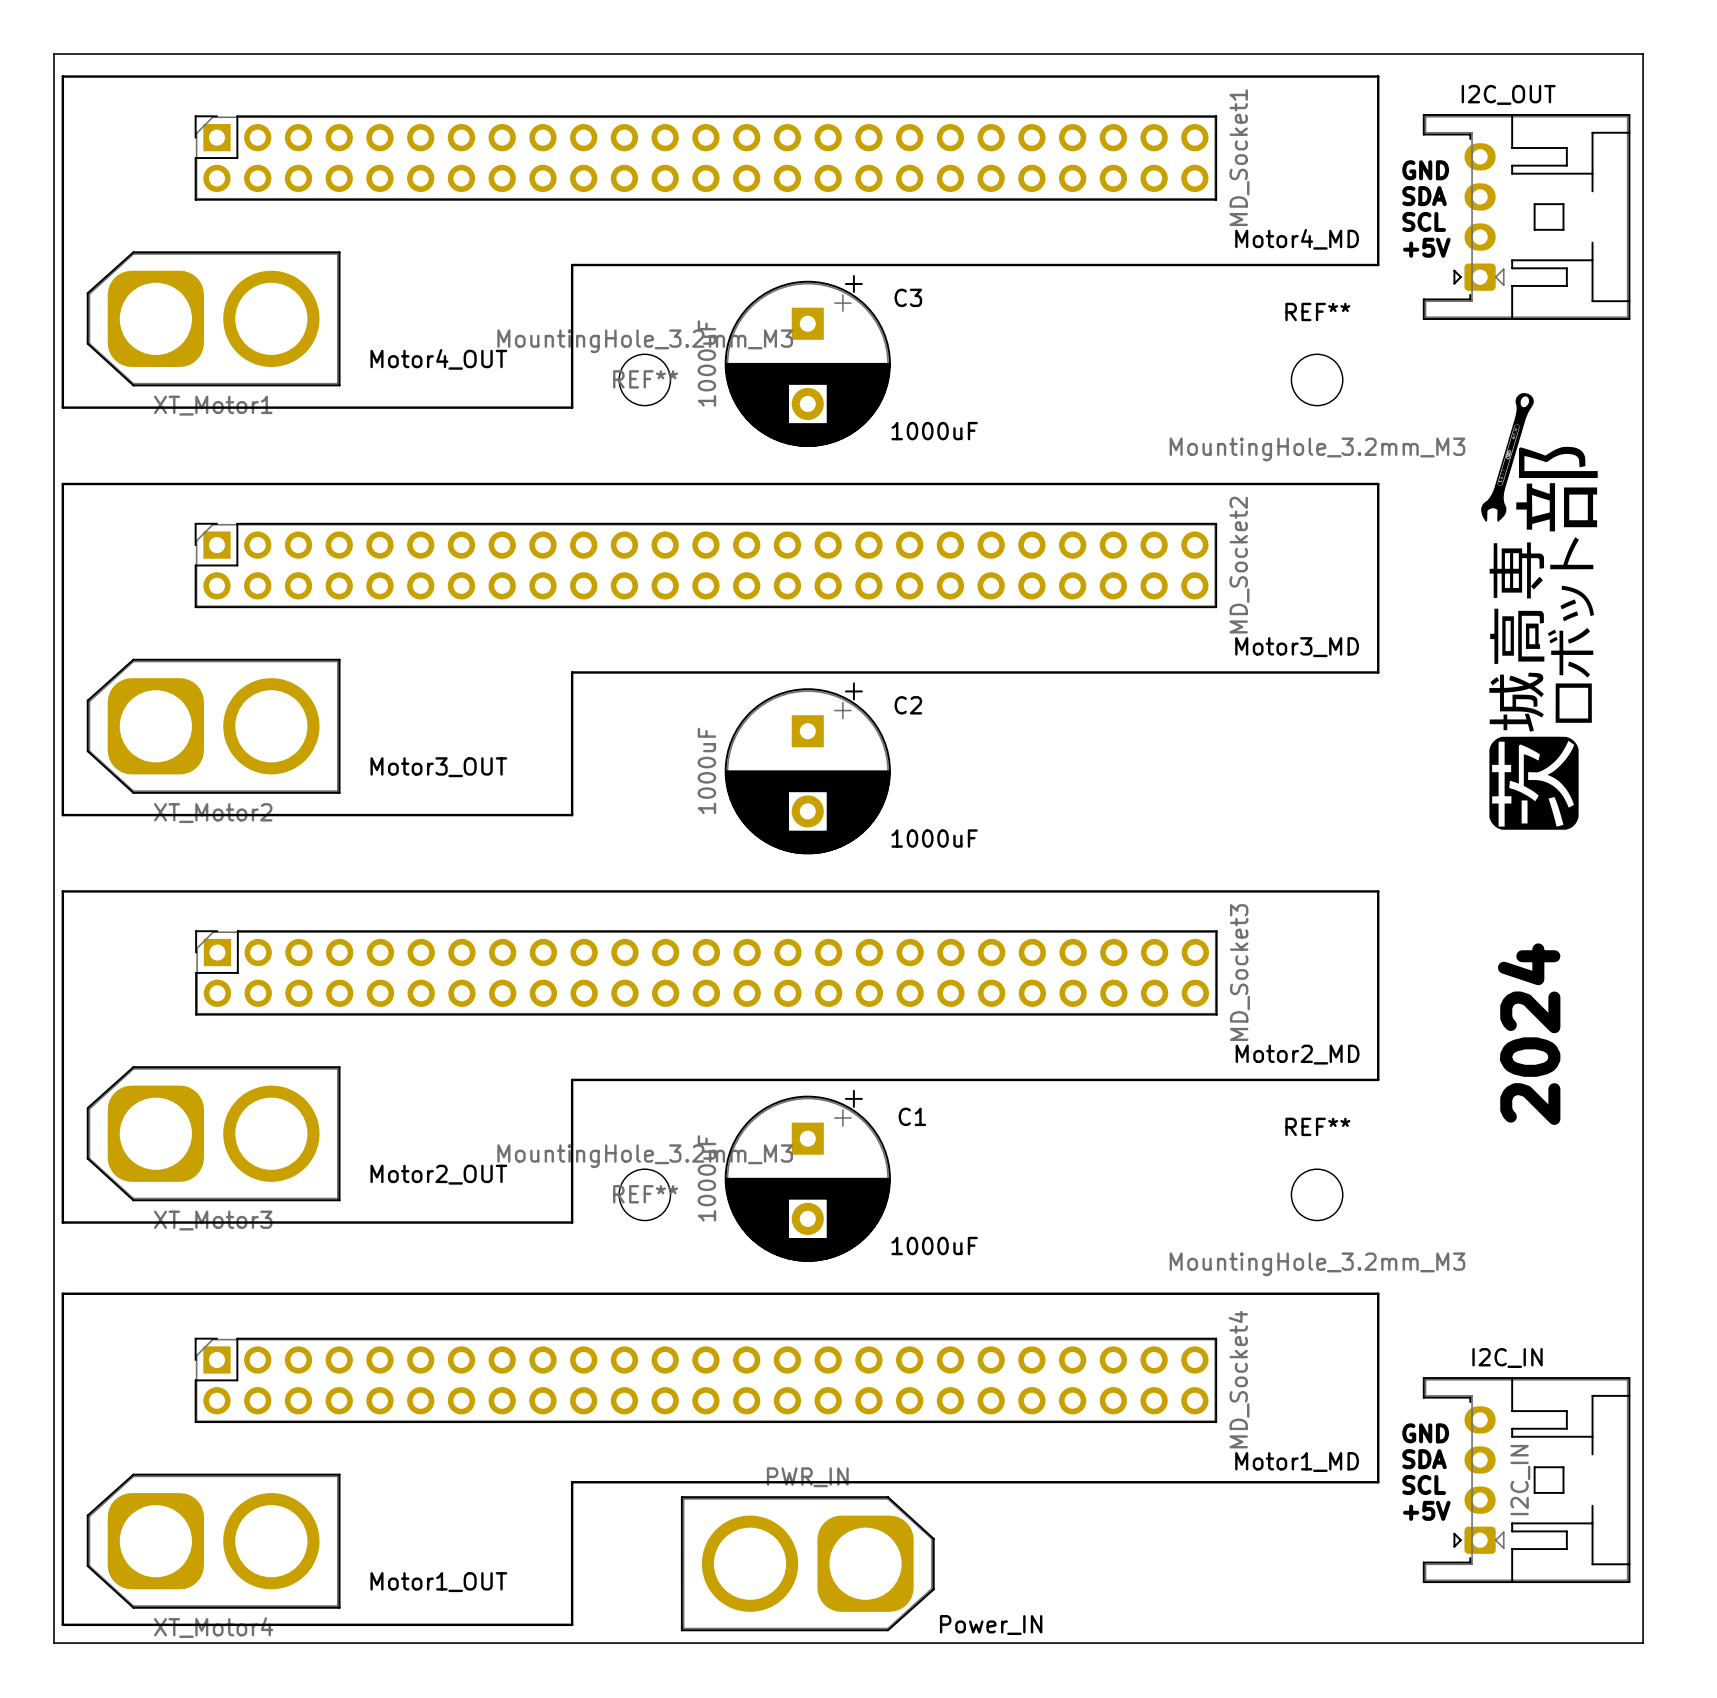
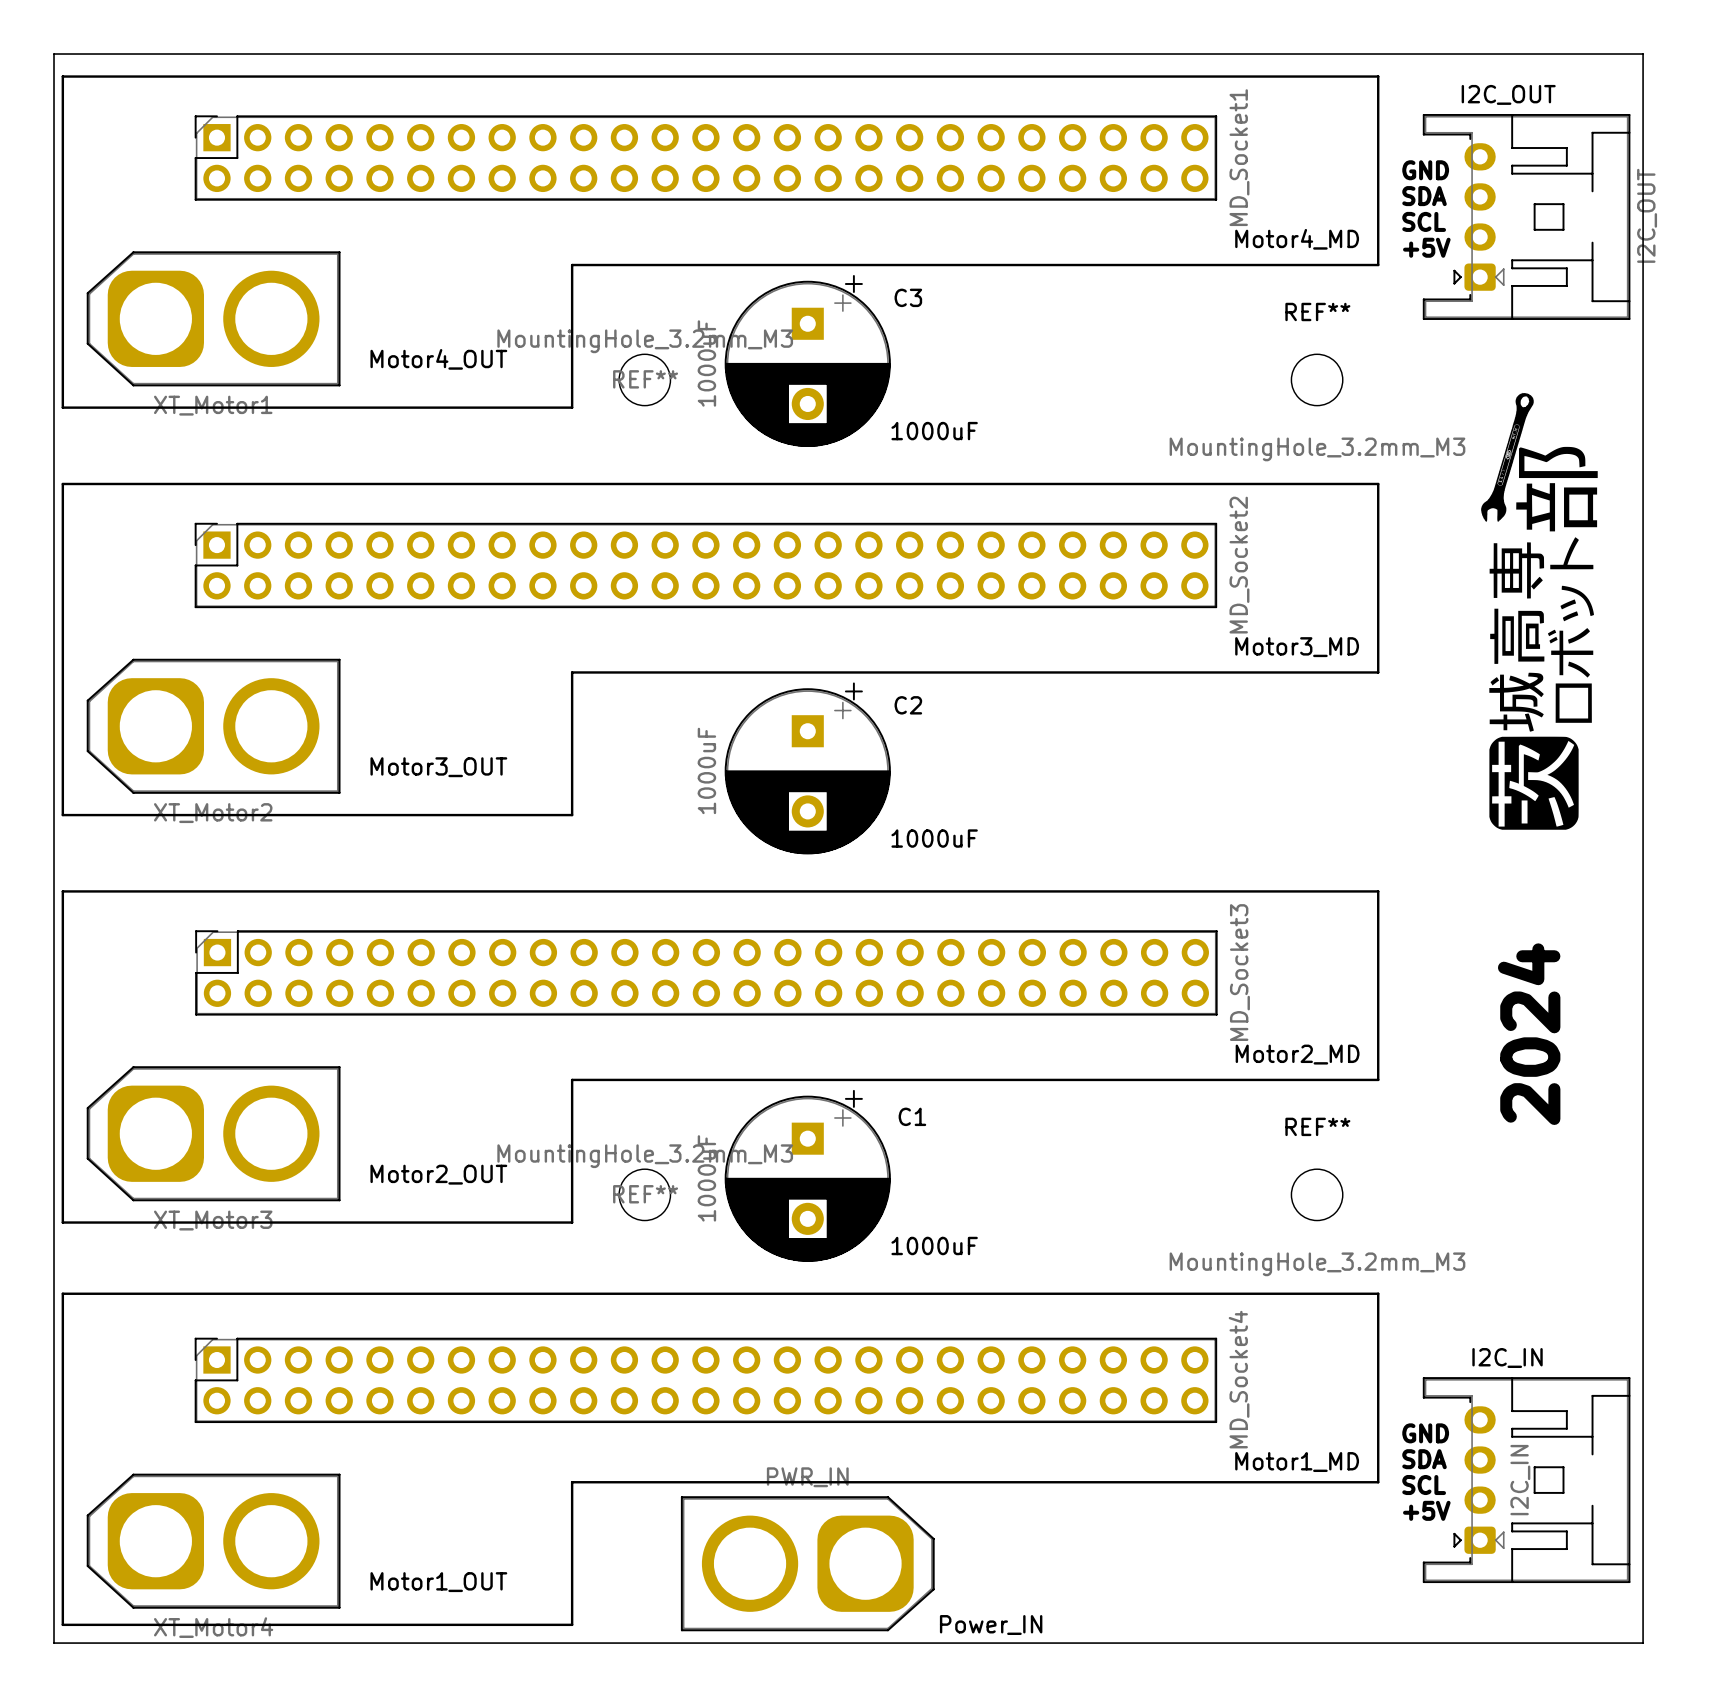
I2C_OUT value: none -> I2C_OUT (1647, 215)

